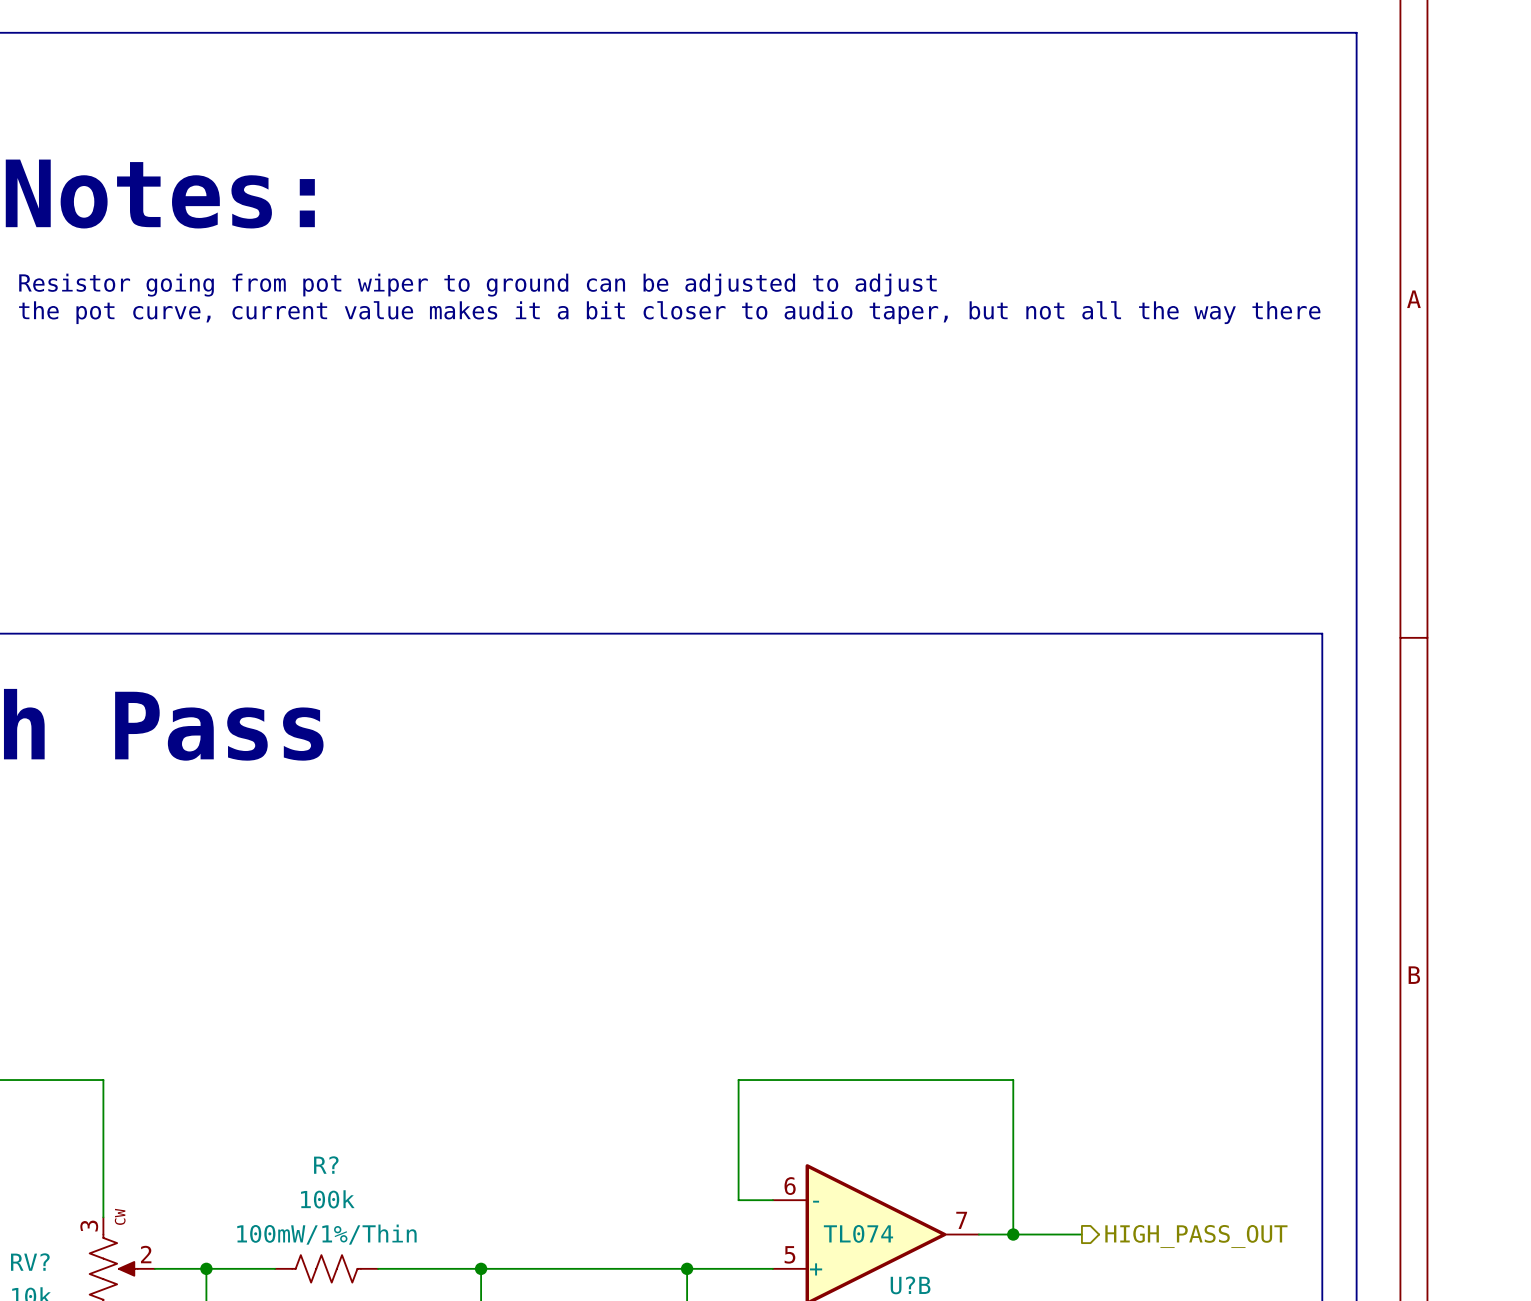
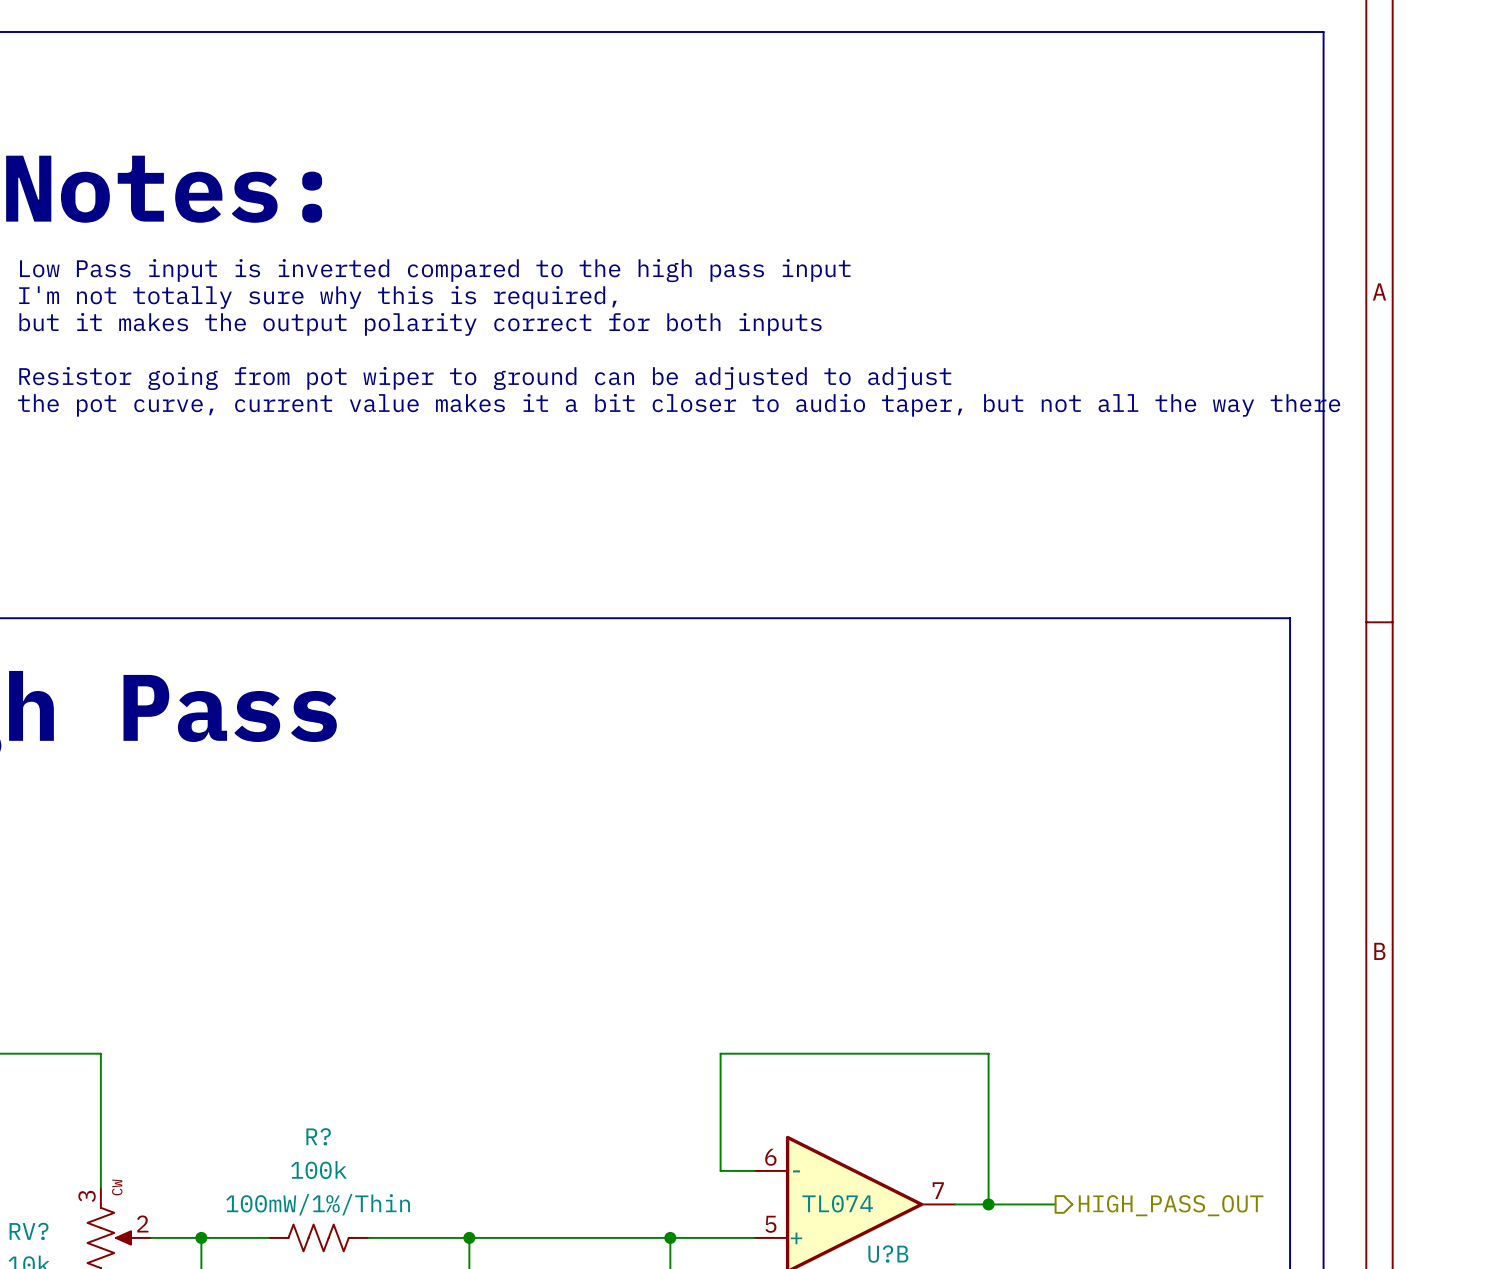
text: none -> Low Pass input is inverted compared to the high pass input (435, 270)
text position: Resistor going from pot wiper to ground can be adjusted to adjust (477, 285) -> Resistor going from pot wiper to ground can be adjusted to adjust (485, 378)
text: none -> I'm not totally sure why this is required, (317, 297)
text position: the pot curve, current value makes it a bit closer to audio taper, but not all the way there (669, 312) -> the pot curve, current value makes it a bit closer to audio taper, but not all the way there (679, 405)
text: none -> but it makes the output polarity correct for both inputs (420, 324)

